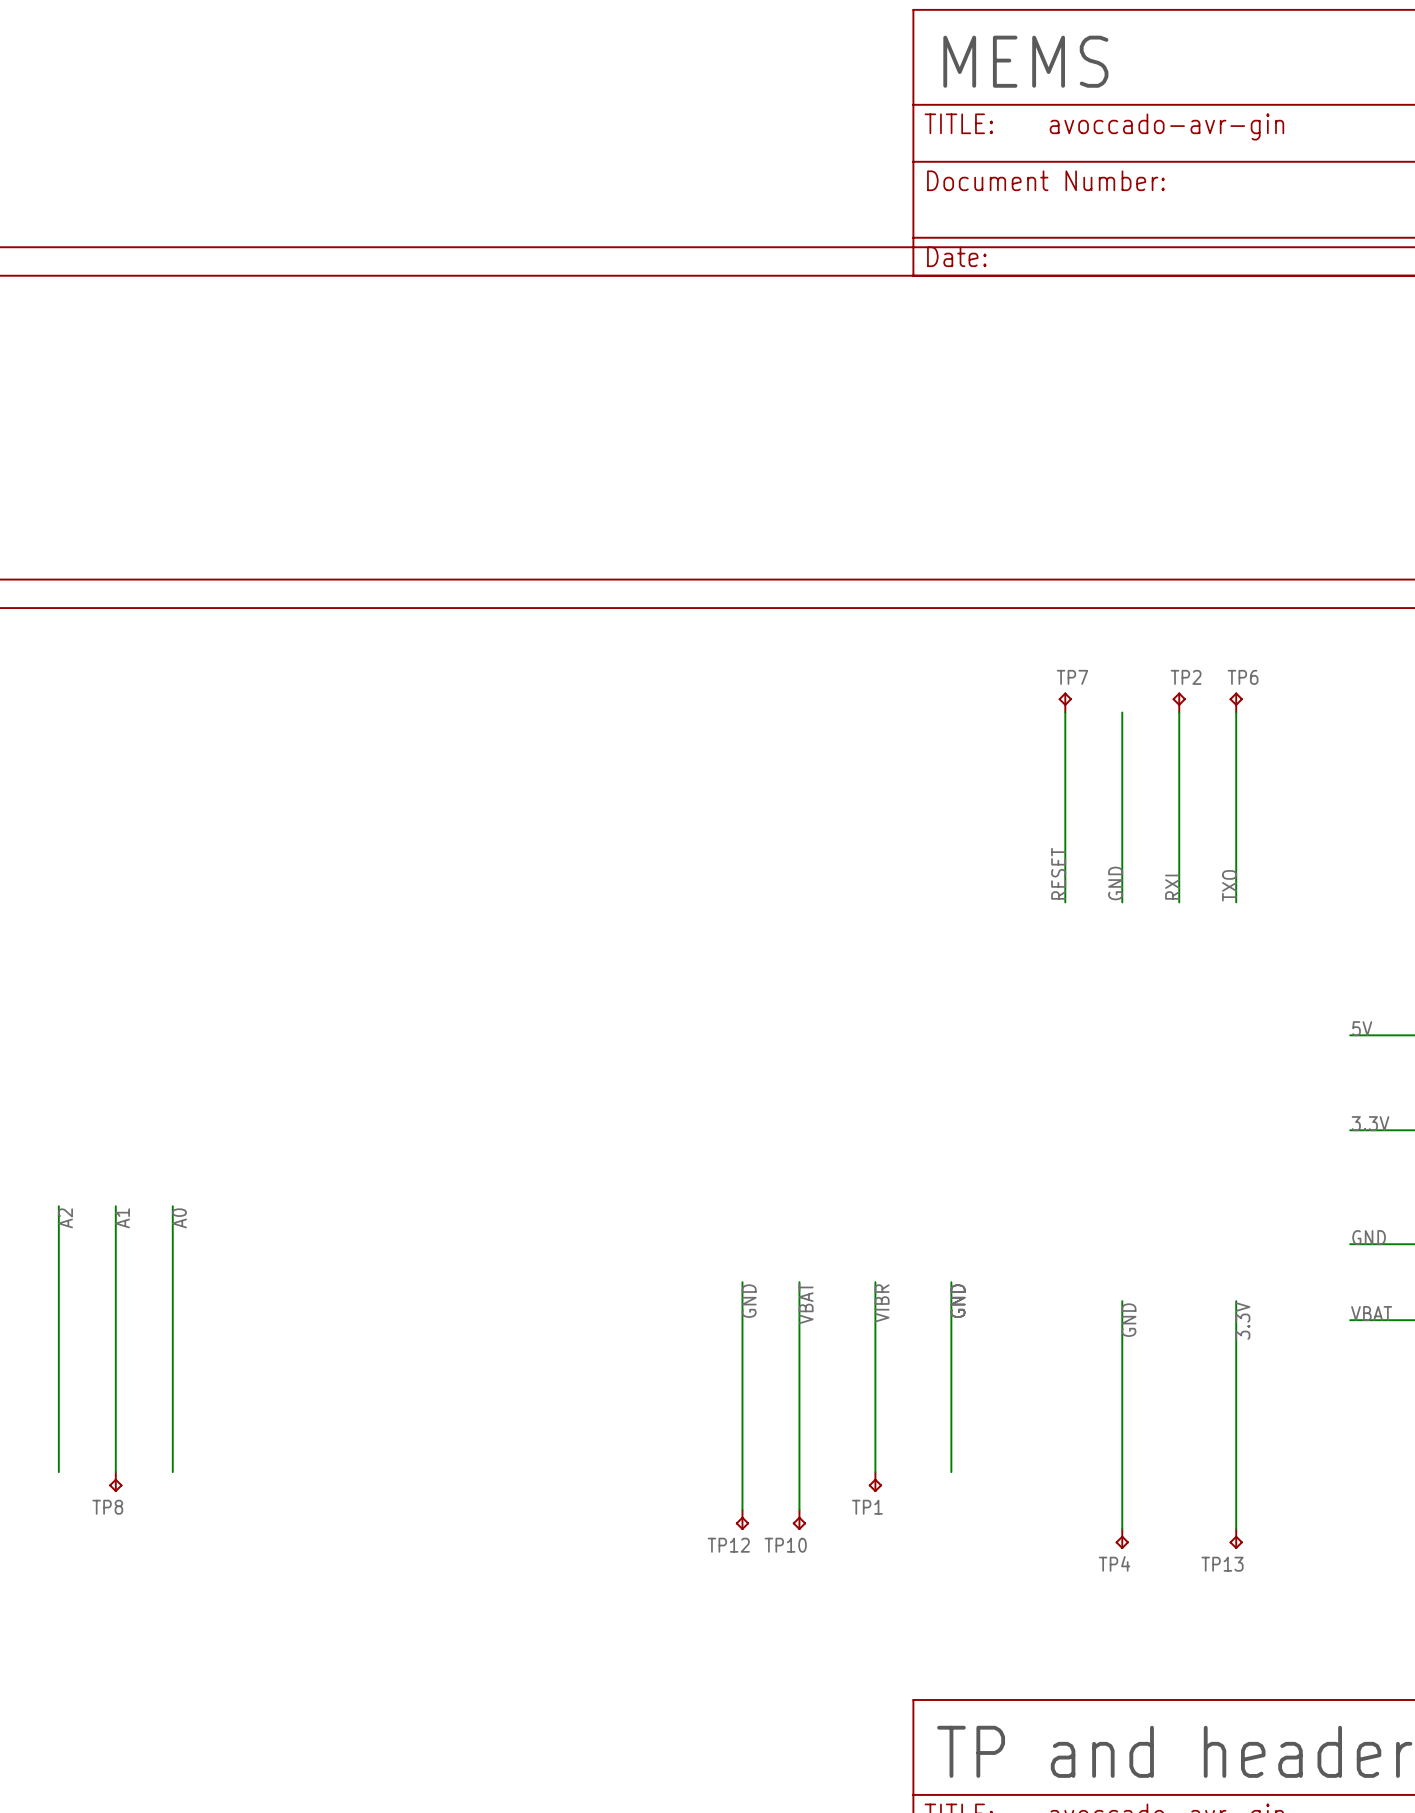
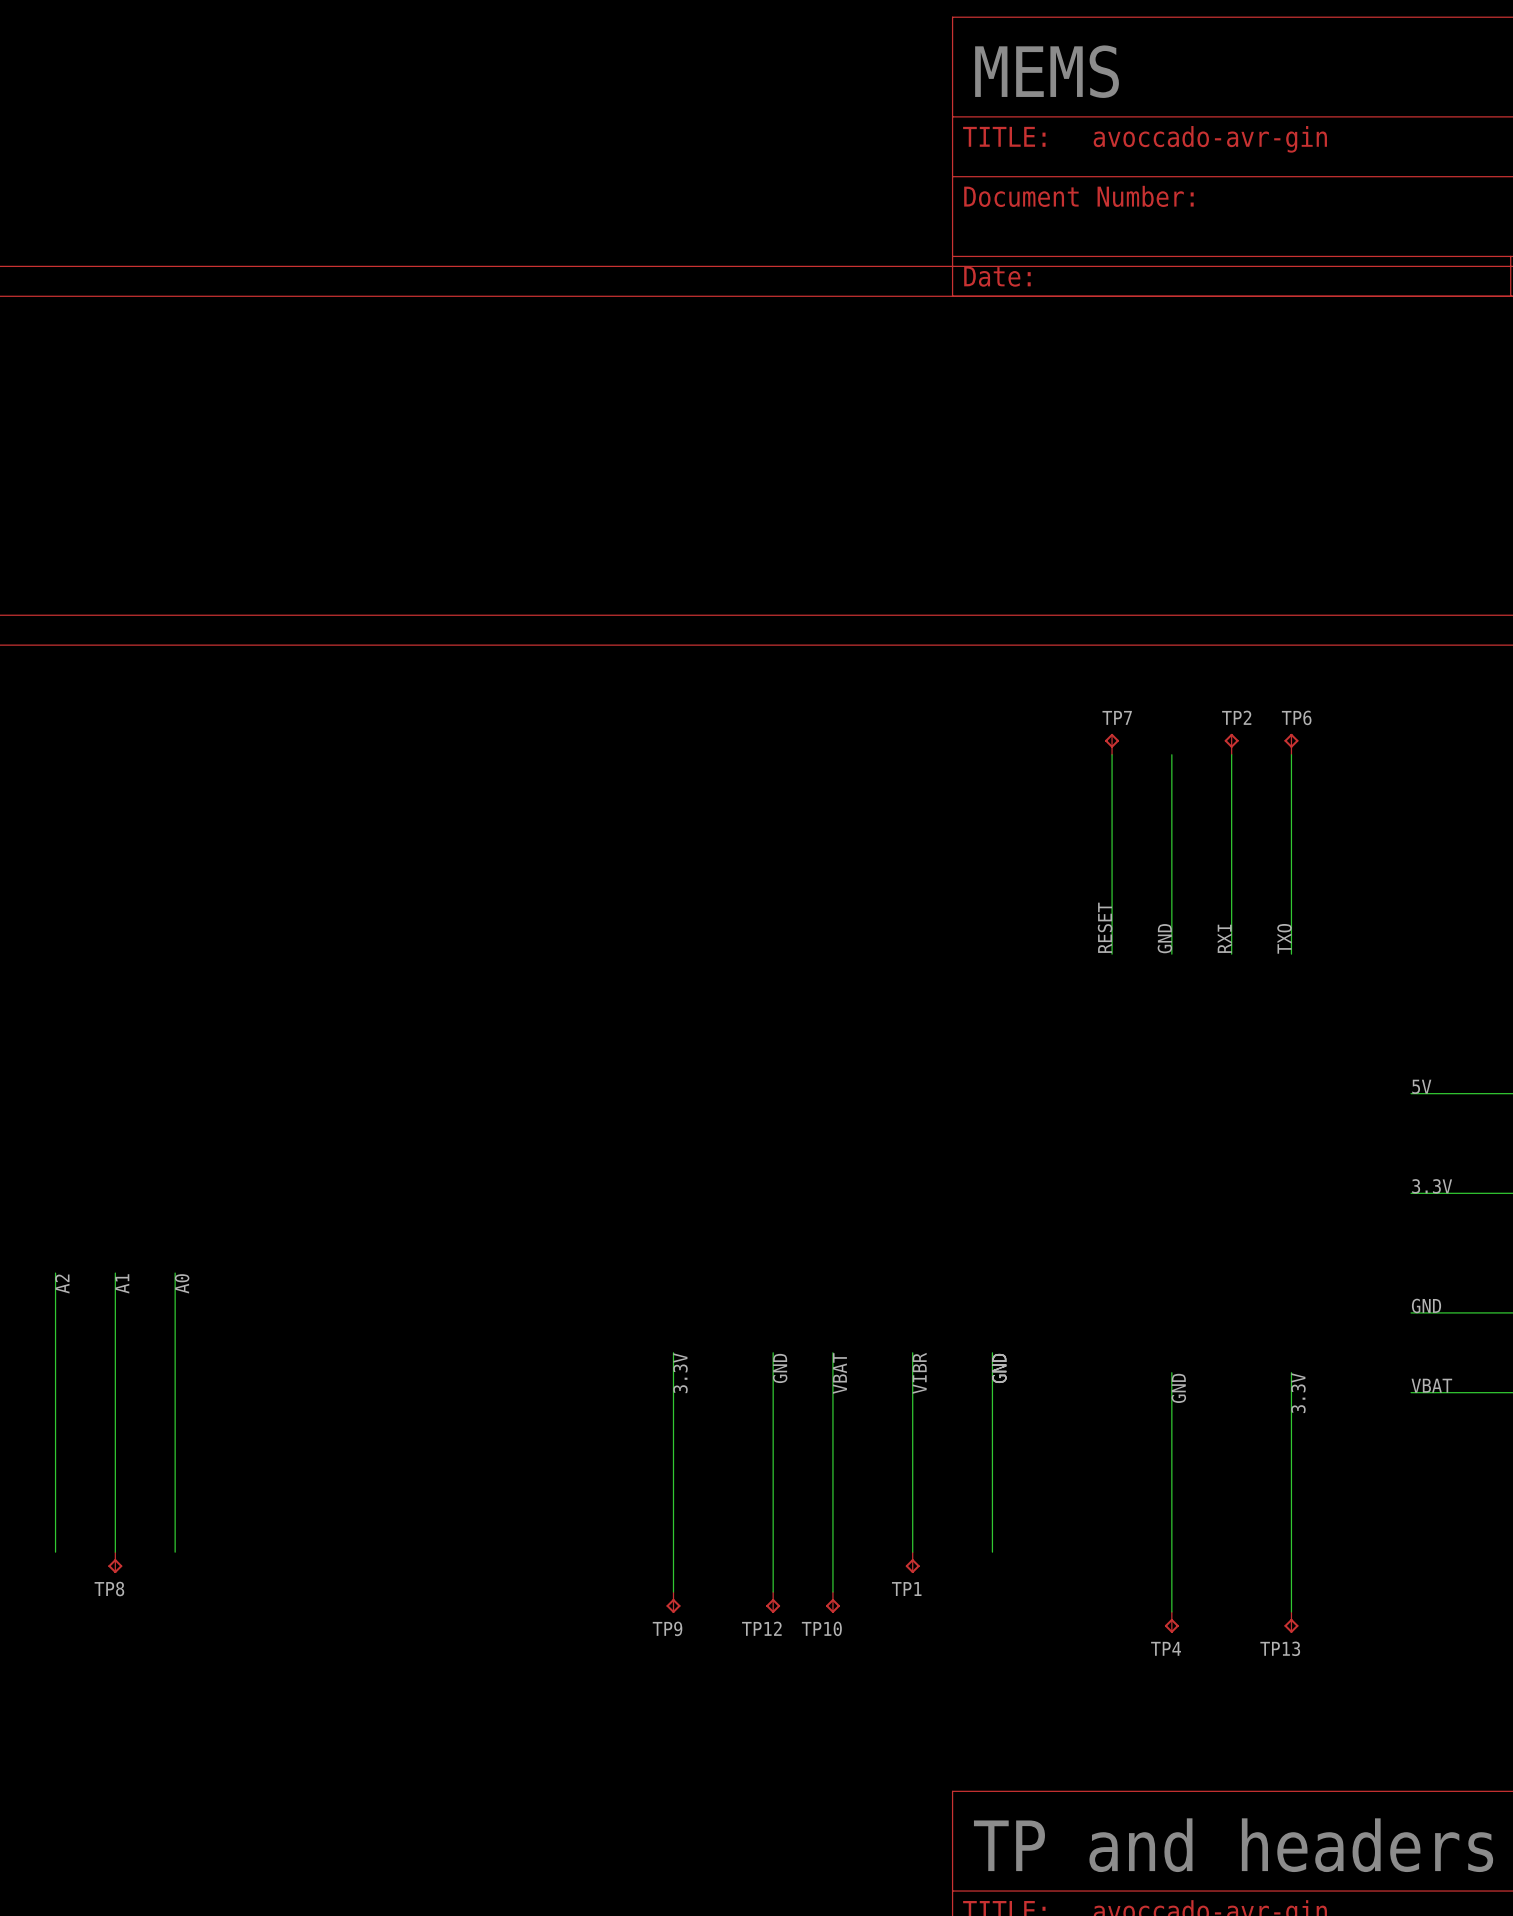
wire: none -> (673, 1352) (673, 1592)
label: none -> 3.3V (680, 1373)
TP9: none -> (673, 1602)

